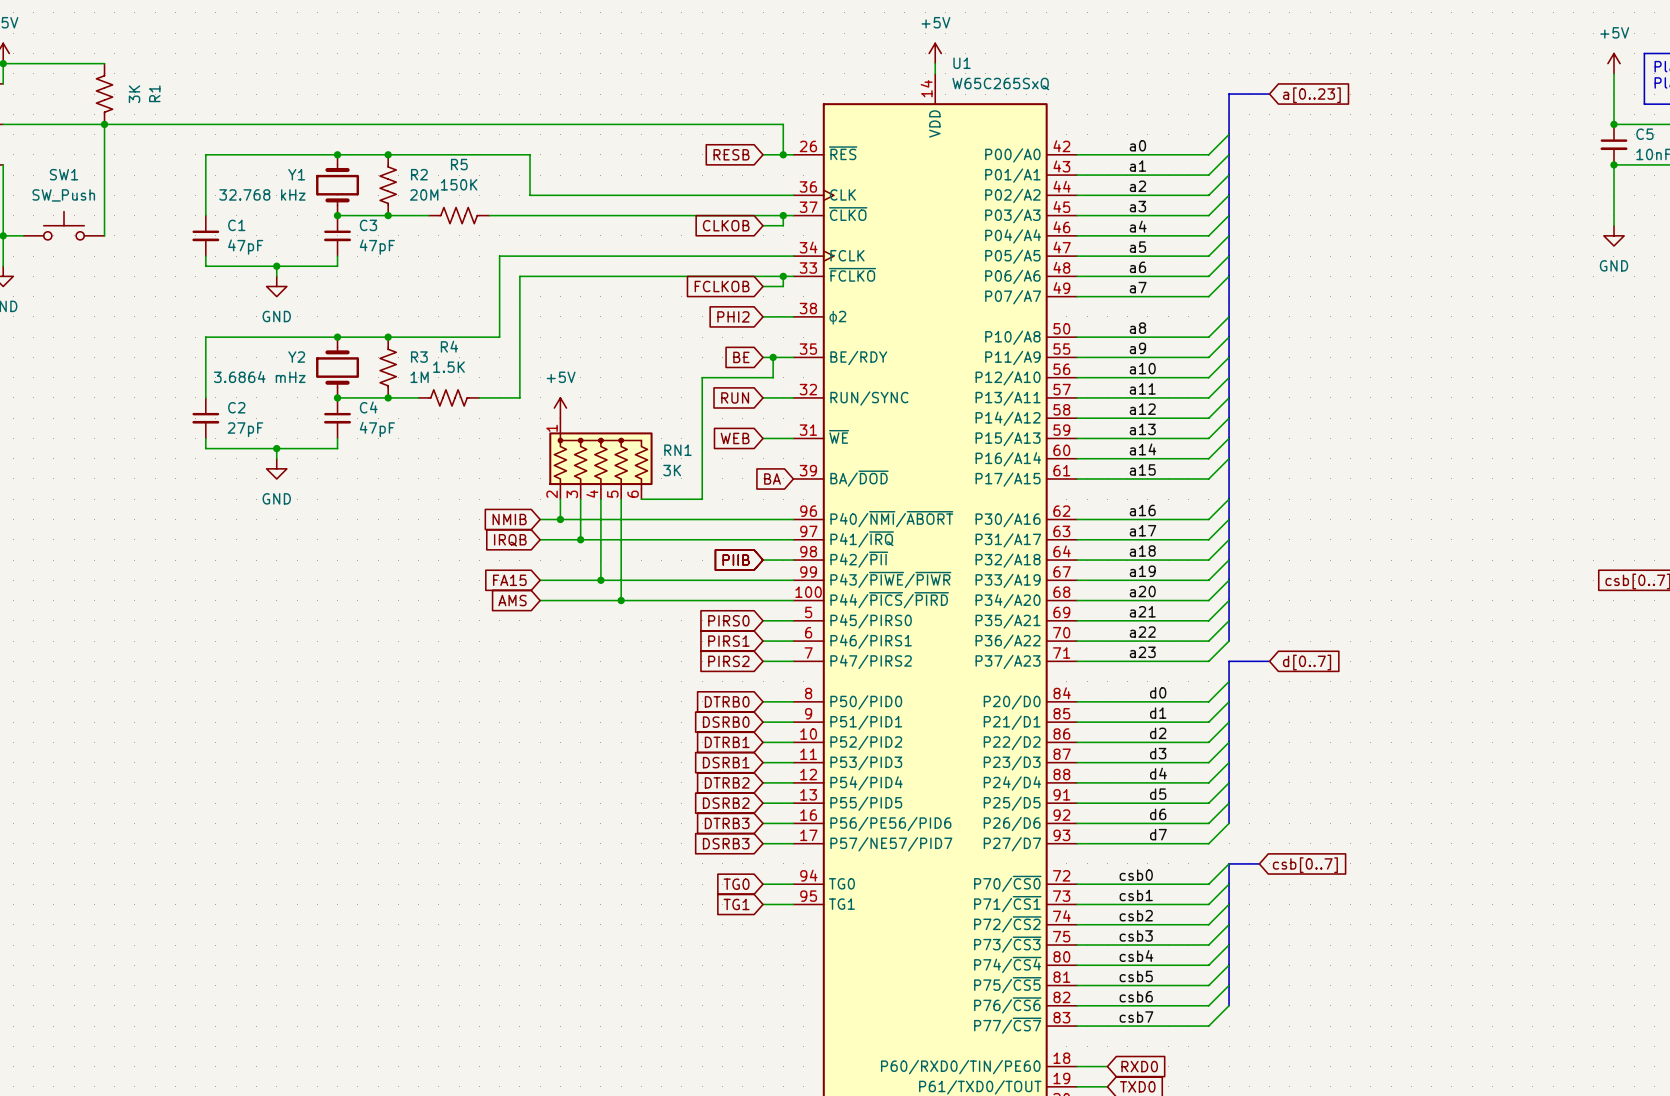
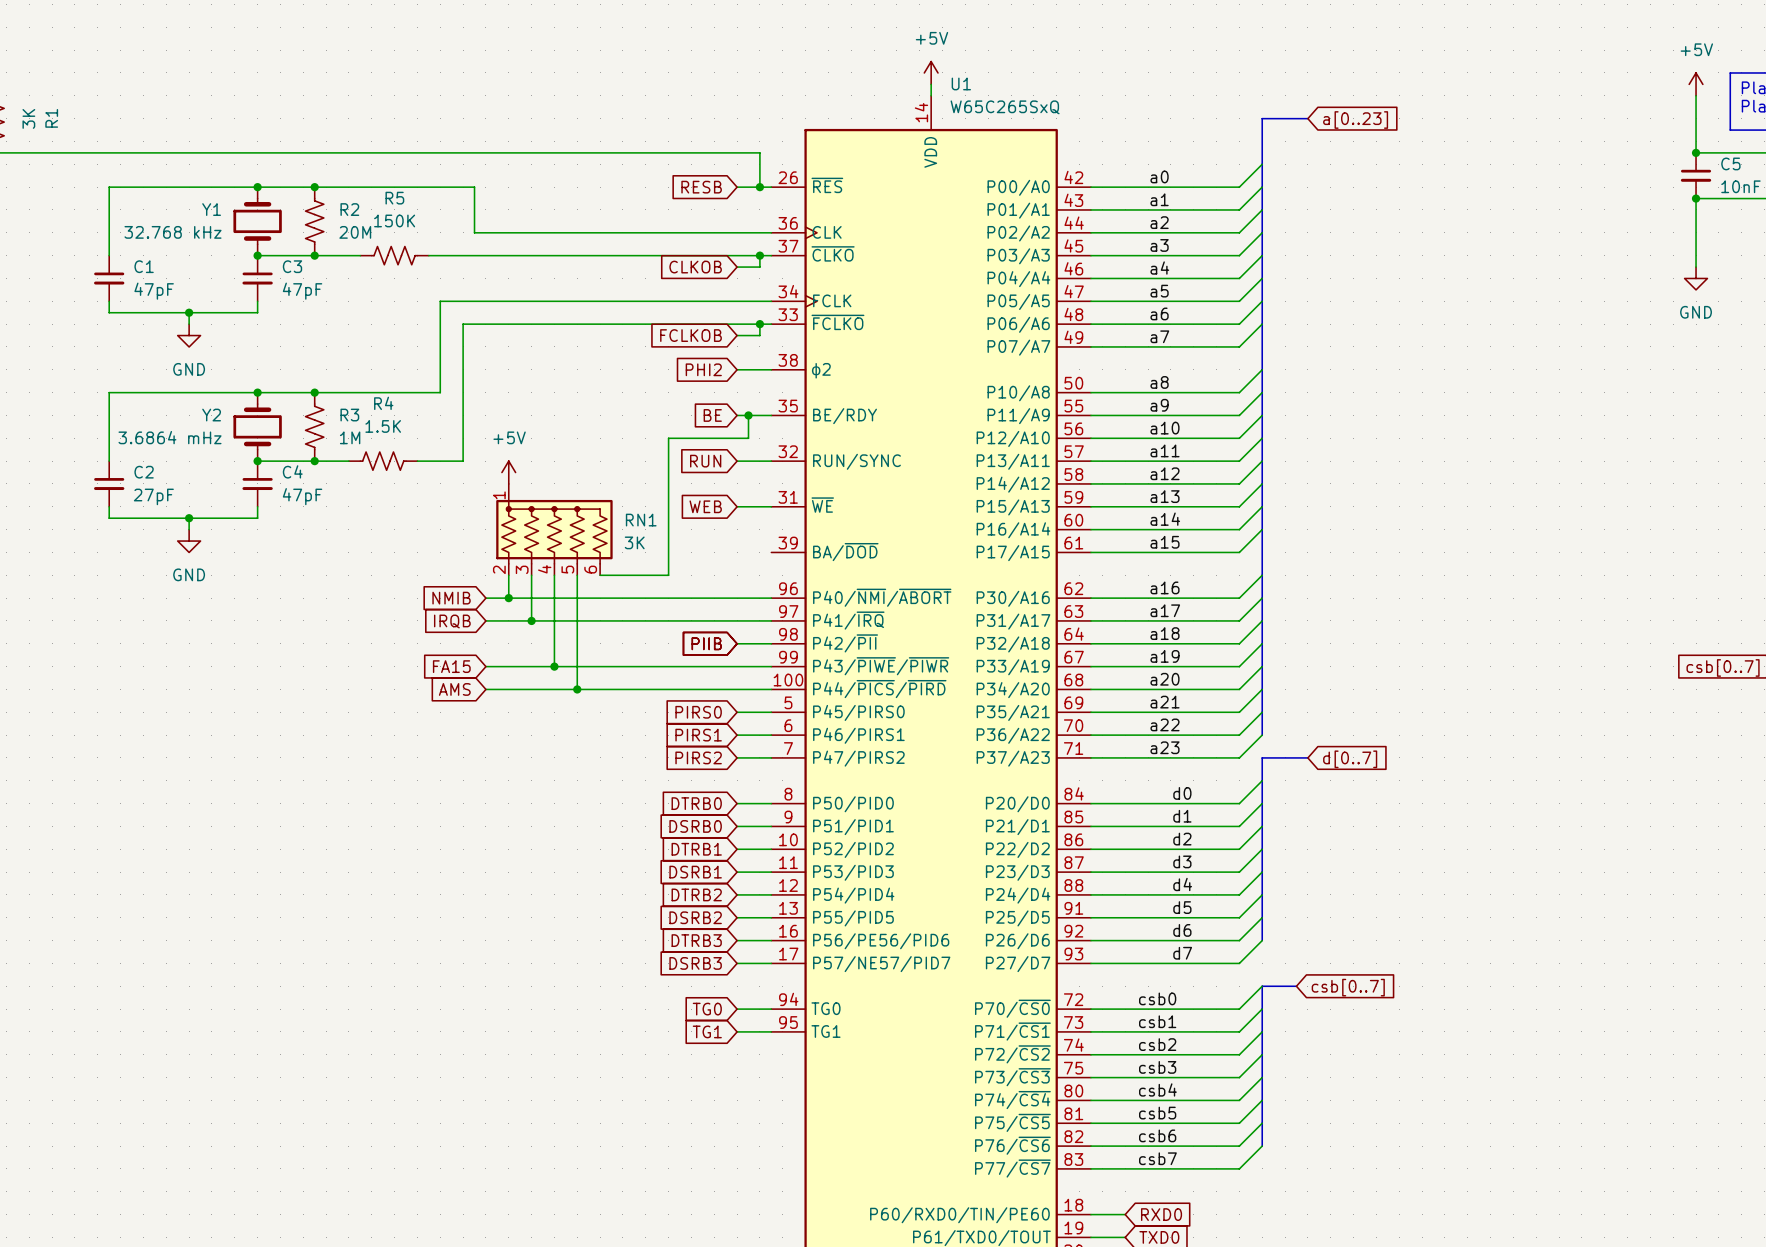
global label: BA (772, 478) -> none

